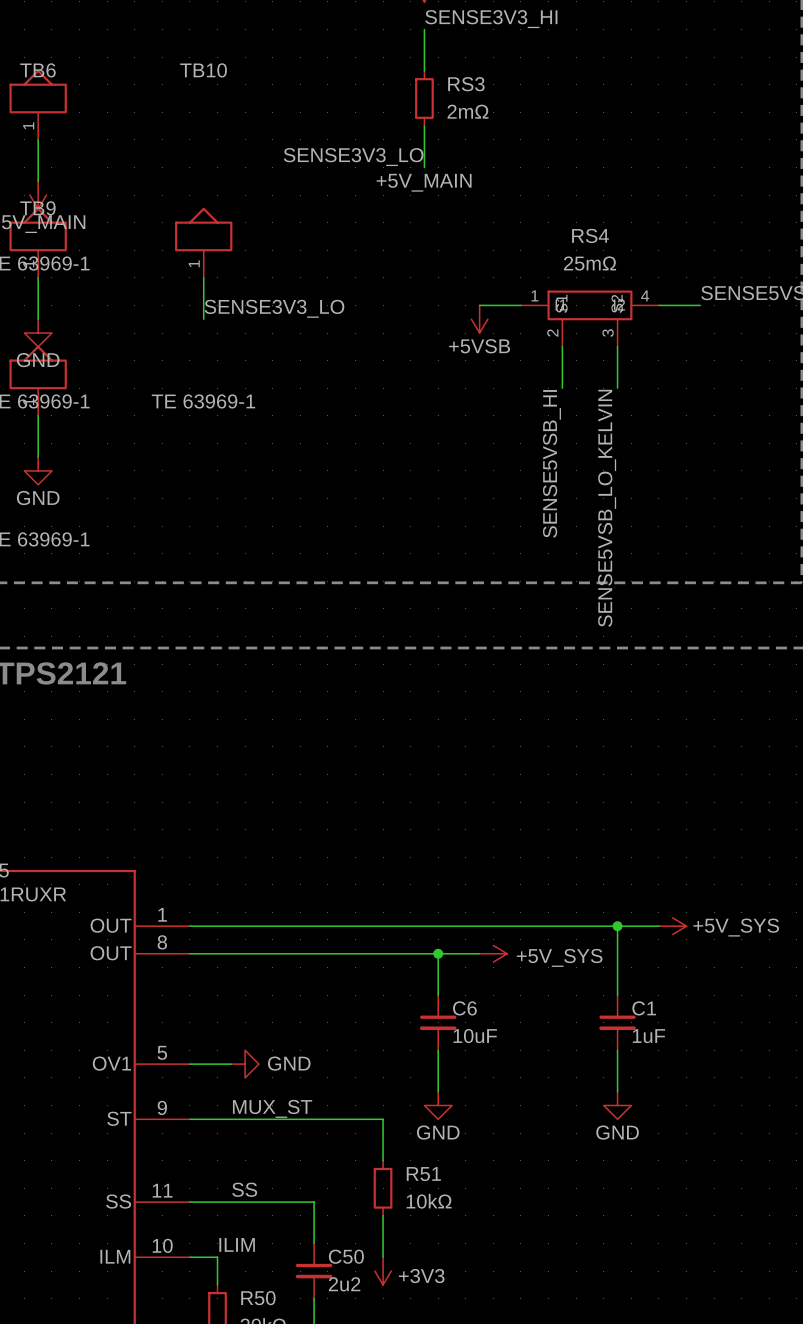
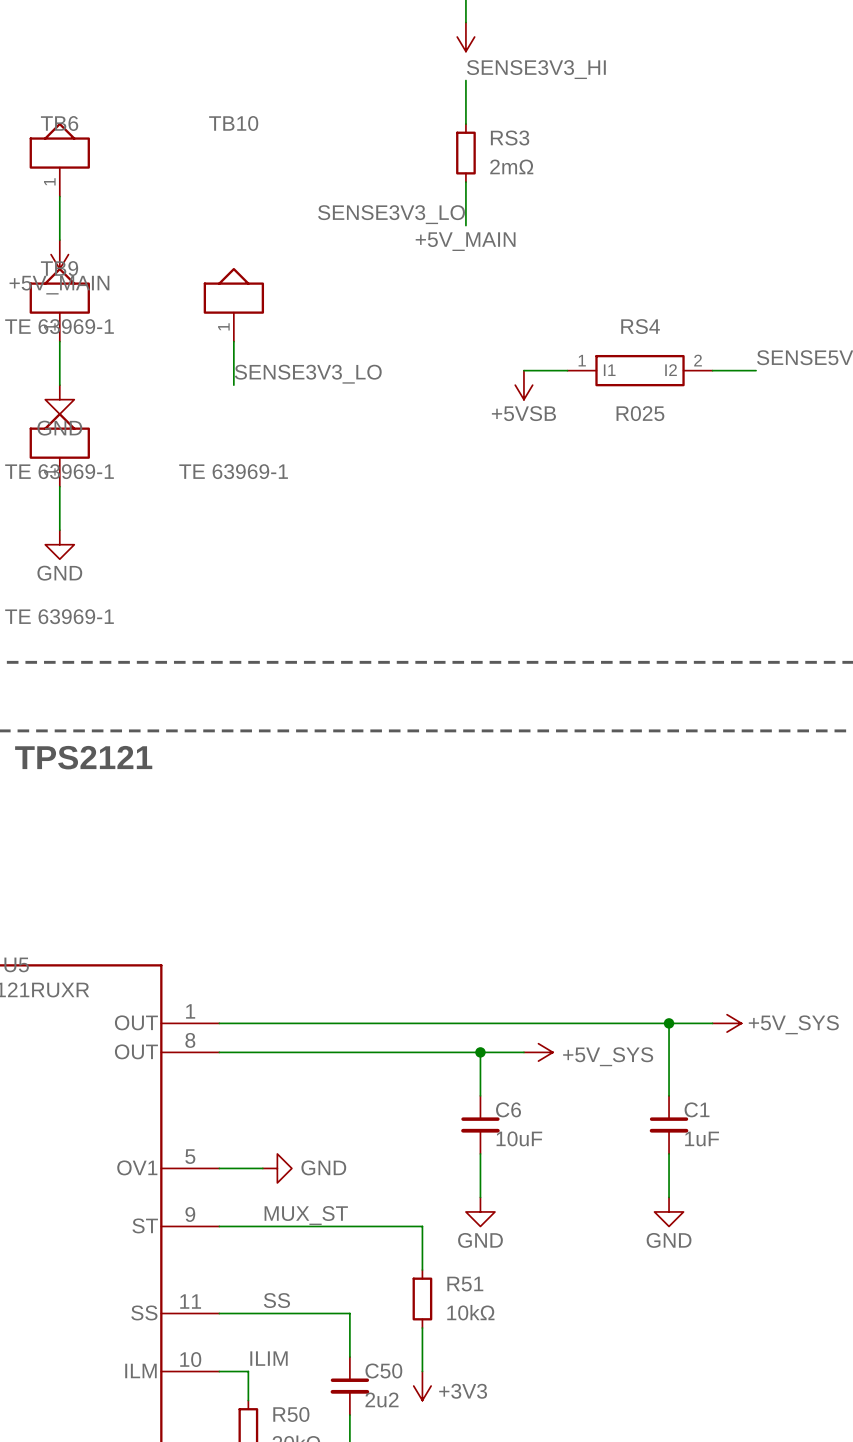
RS4 name position: RS4 (590, 235) -> RS4 (640, 326)
RS4 value: 25mΩ (590, 263) -> R025 (640, 413)
RS4 symbol: [520, 290, 659, 347] -> [567, 354, 713, 387]
wire: (562, 346) (562, 388) -> none
wire: (617, 346) (617, 388) -> none
label: SENSE5VSB_HI (551, 463) -> none
label: SENSE5VSB_LO_KELVIN (607, 508) -> none

